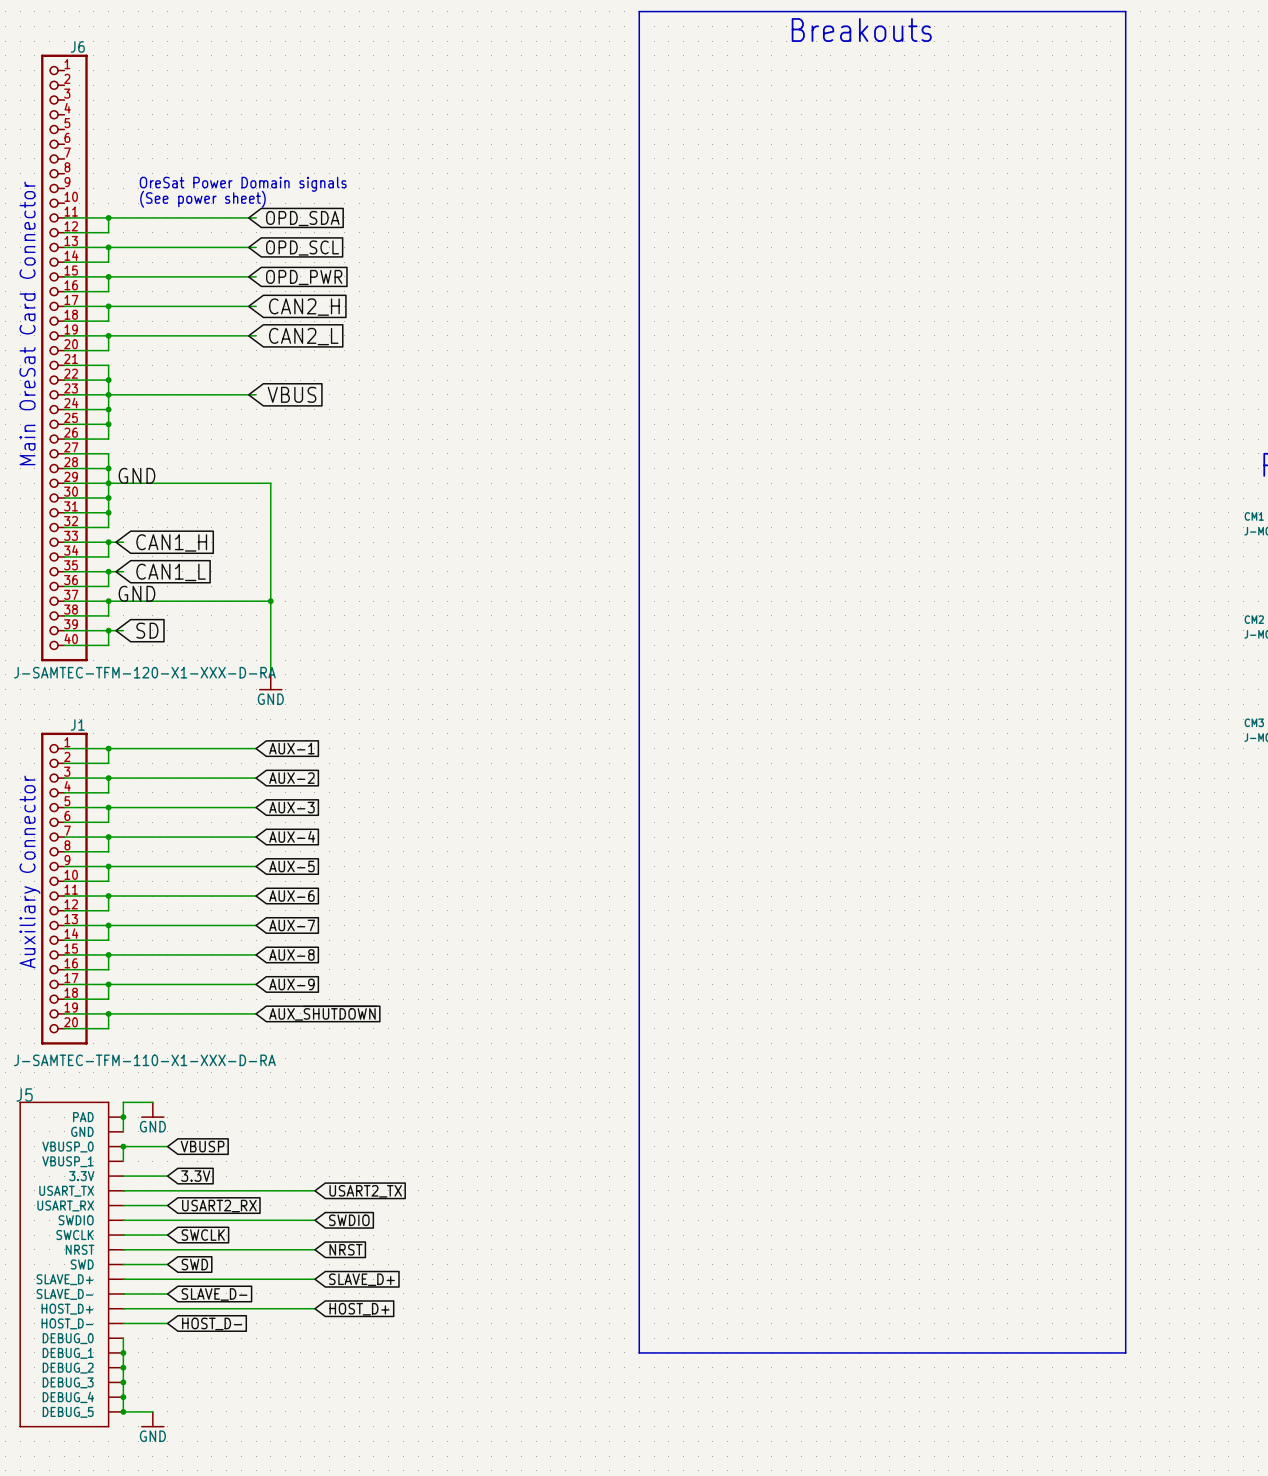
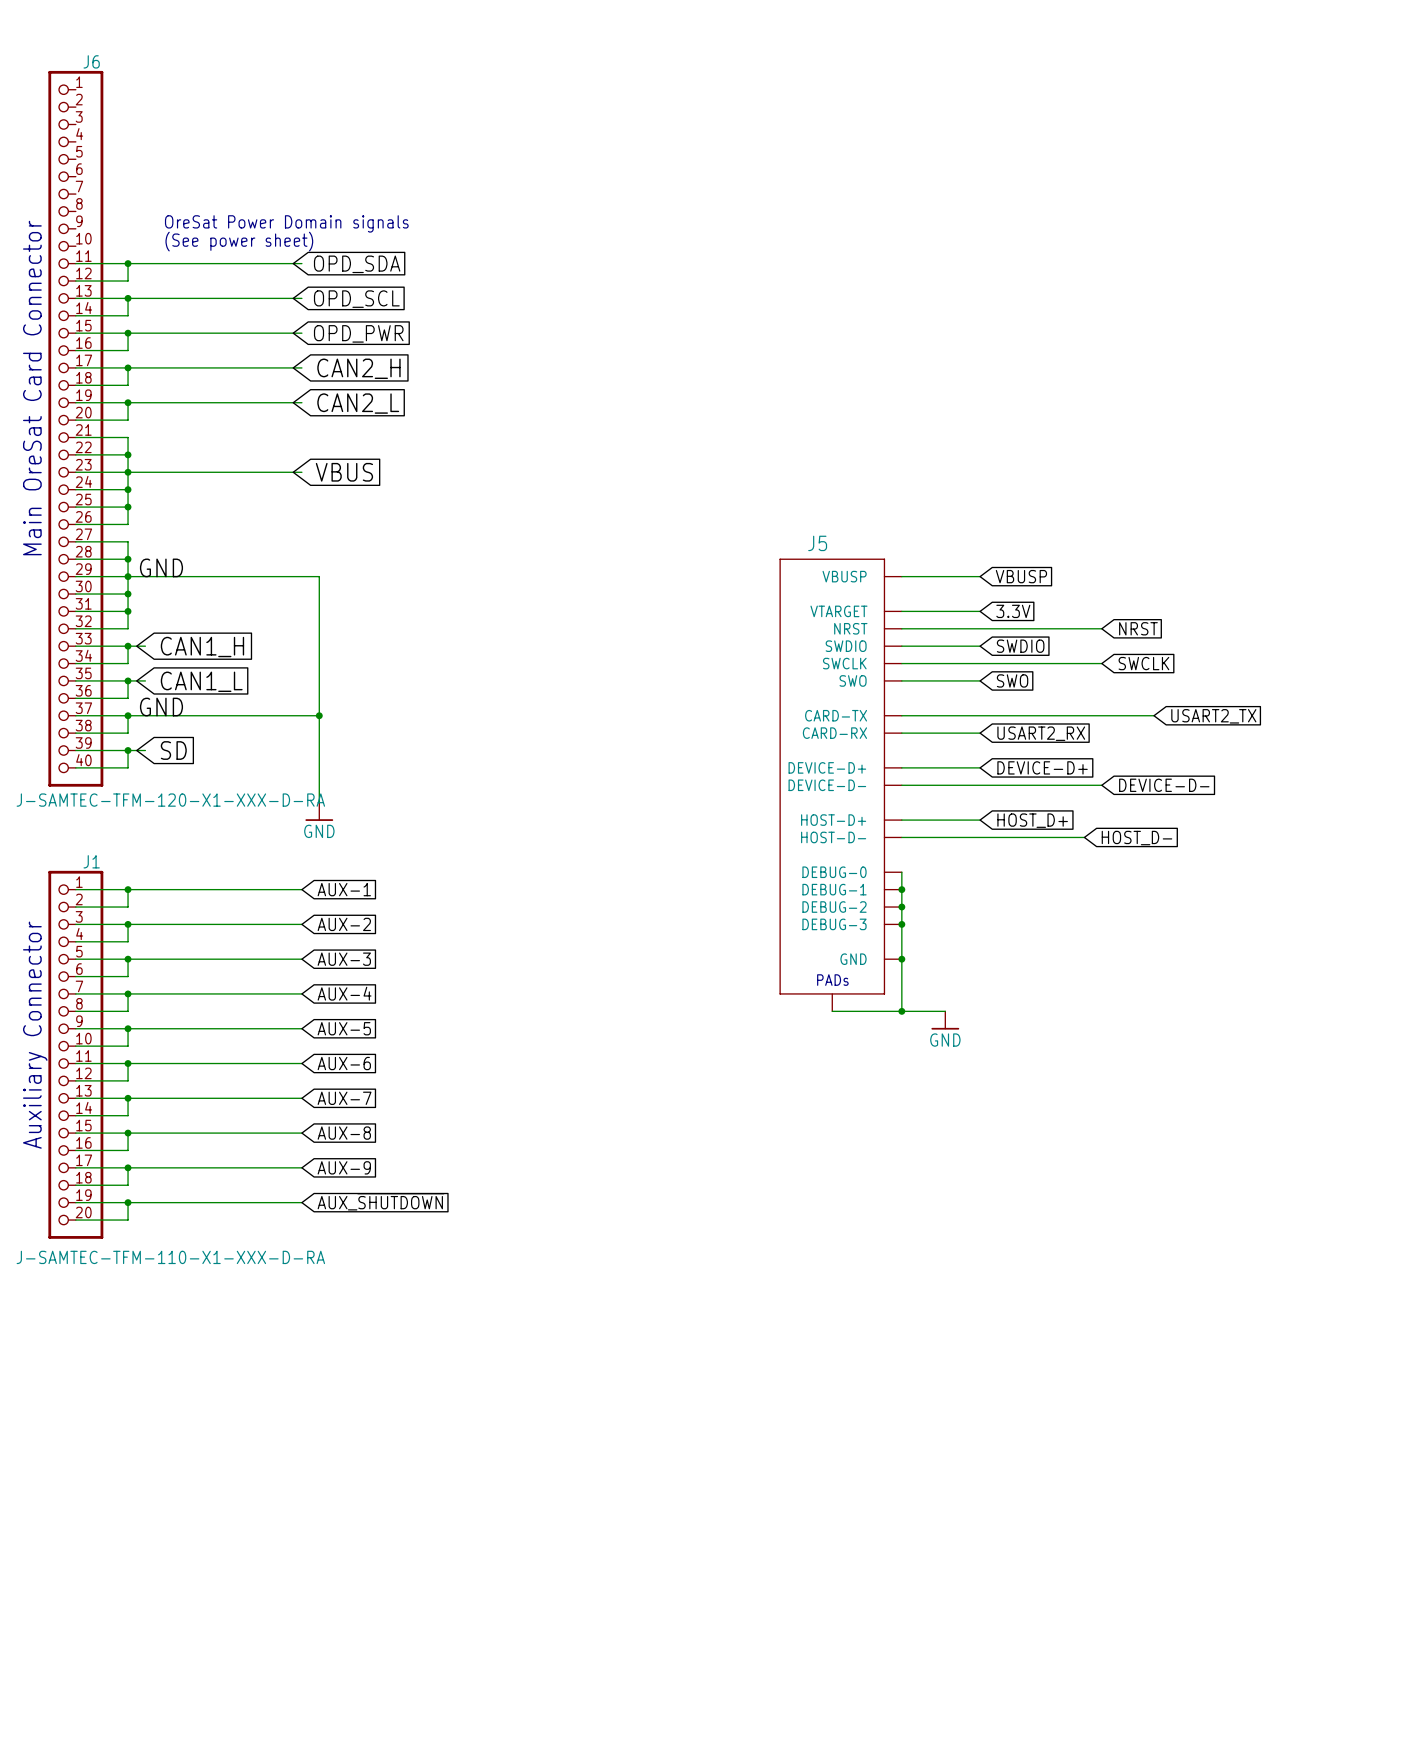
line: (639, 11) (1125, 11) (1125, 1352) (639, 1352) (639, 11) -> none
text: Breakouts (861, 30) -> none
wire: none -> (901, 576) (980, 576)
global label: none -> VBUSP (1021, 576)
wire: none -> (901, 611) (980, 611)
global label: none -> 3.3V (1013, 611)
wire: none -> (901, 628) (1101, 628)
global label: none -> NRST (1138, 628)
wire: none -> (901, 646) (980, 646)
global label: none -> SWDIO (1020, 646)
wire: none -> (901, 663) (1101, 663)
global label: none -> SWCLK (1143, 663)
wire: none -> (901, 680) (980, 680)
global label: none -> SWO (1012, 680)
wire: none -> (901, 715) (1153, 715)
global label: none -> USART2_TX (1213, 716)
wire: none -> (901, 733) (980, 733)
global label: none -> USART2_RX (1041, 733)
wire: none -> (901, 767) (980, 767)
global label: none -> DEVICE-D+ (1042, 767)
wire: none -> (901, 785) (1101, 785)
global label: none -> DEVICE-D- (1164, 785)
wire: none -> (901, 820) (980, 820)
global label: none -> HOST_D+ (1032, 820)
wire: none -> (901, 837) (1084, 837)
global label: none -> HOST_D- (1136, 838)
wire: none -> (901, 872) (901, 1011)
junction: none -> (901, 889)
junction: none -> (901, 907)
junction: none -> (901, 924)
junction: none -> (901, 959)
wire: none -> (832, 1011) (945, 1011)
junction: none -> (901, 1011)
power symbol: none -> GND (945, 1020)
J5 name position: J5 (24, 1094) -> J5 (817, 543)
J5 symbol: [19, 1101, 124, 1428] -> [779, 558, 902, 1012]
wire: (152, 1102) (123, 1102) (123, 1131) -> none
power symbol: GND (152, 1110) -> none
junction: (123, 1117) -> none
junction: (123, 1146) -> none
wire: (167, 1146) (123, 1146) (123, 1161) -> none
global label: VBUSP (202, 1146) -> none
wire: (123, 1176) (167, 1176) -> none
global label: 3.3V (195, 1176) -> none
wire: (123, 1190) (314, 1190) -> none
global label: USART2_TX (365, 1191) -> none
wire: (123, 1205) (167, 1205) -> none
global label: USART2_RX (219, 1206) -> none
wire: (123, 1220) (314, 1220) -> none
global label: SWDIO (349, 1220) -> none
wire: (123, 1235) (167, 1235) -> none
global label: SWCLK (203, 1235) -> none
wire: (123, 1249) (314, 1249) -> none
global label: NRST (346, 1249) -> none
wire: (123, 1264) (167, 1264) -> none
global label: SWD (194, 1264) -> none
wire: (123, 1279) (314, 1279) -> none
global label: SLAVE_D+ (361, 1279) -> none
wire: (123, 1293) (167, 1293) -> none
global label: SLAVE_D- (214, 1294) -> none
wire: (123, 1308) (314, 1308) -> none
global label: HOST_D+ (359, 1309) -> none
wire: (123, 1323) (167, 1323) -> none
global label: HOST_D- (212, 1323) -> none
wire: (123, 1338) (123, 1411) (152, 1411) -> none
junction: (123, 1352) -> none
junction: (123, 1367) -> none
junction: (123, 1382) -> none
junction: (123, 1397) -> none
junction: (123, 1411) -> none
power symbol: GND (152, 1419) -> none

